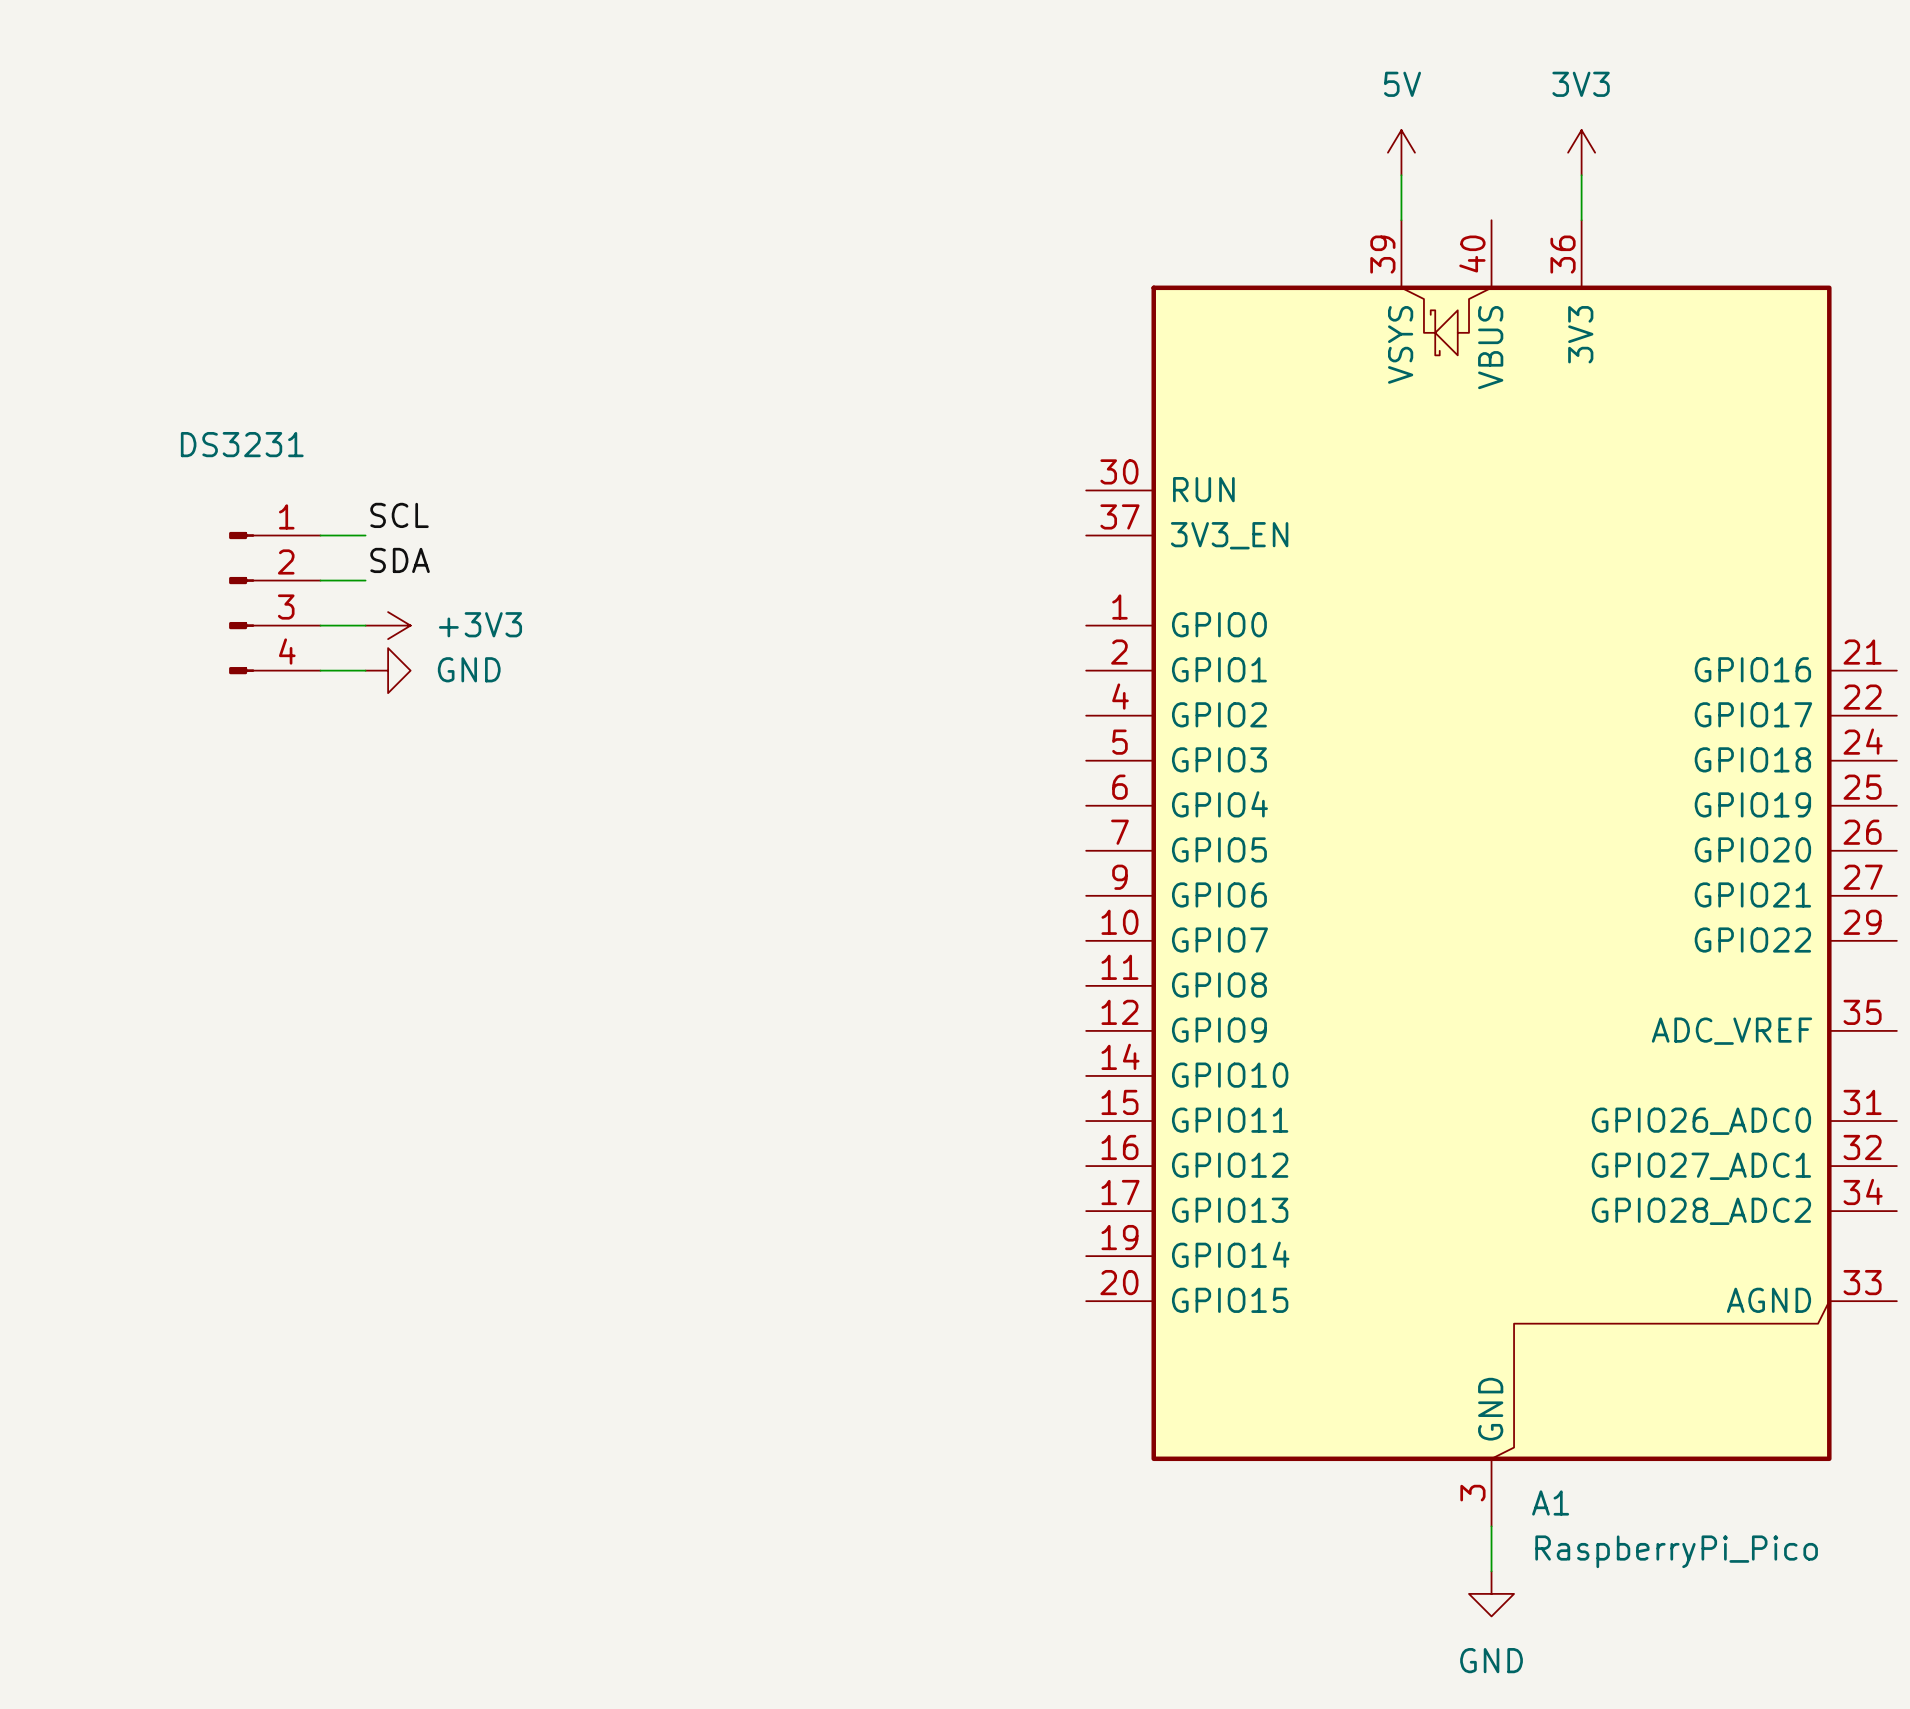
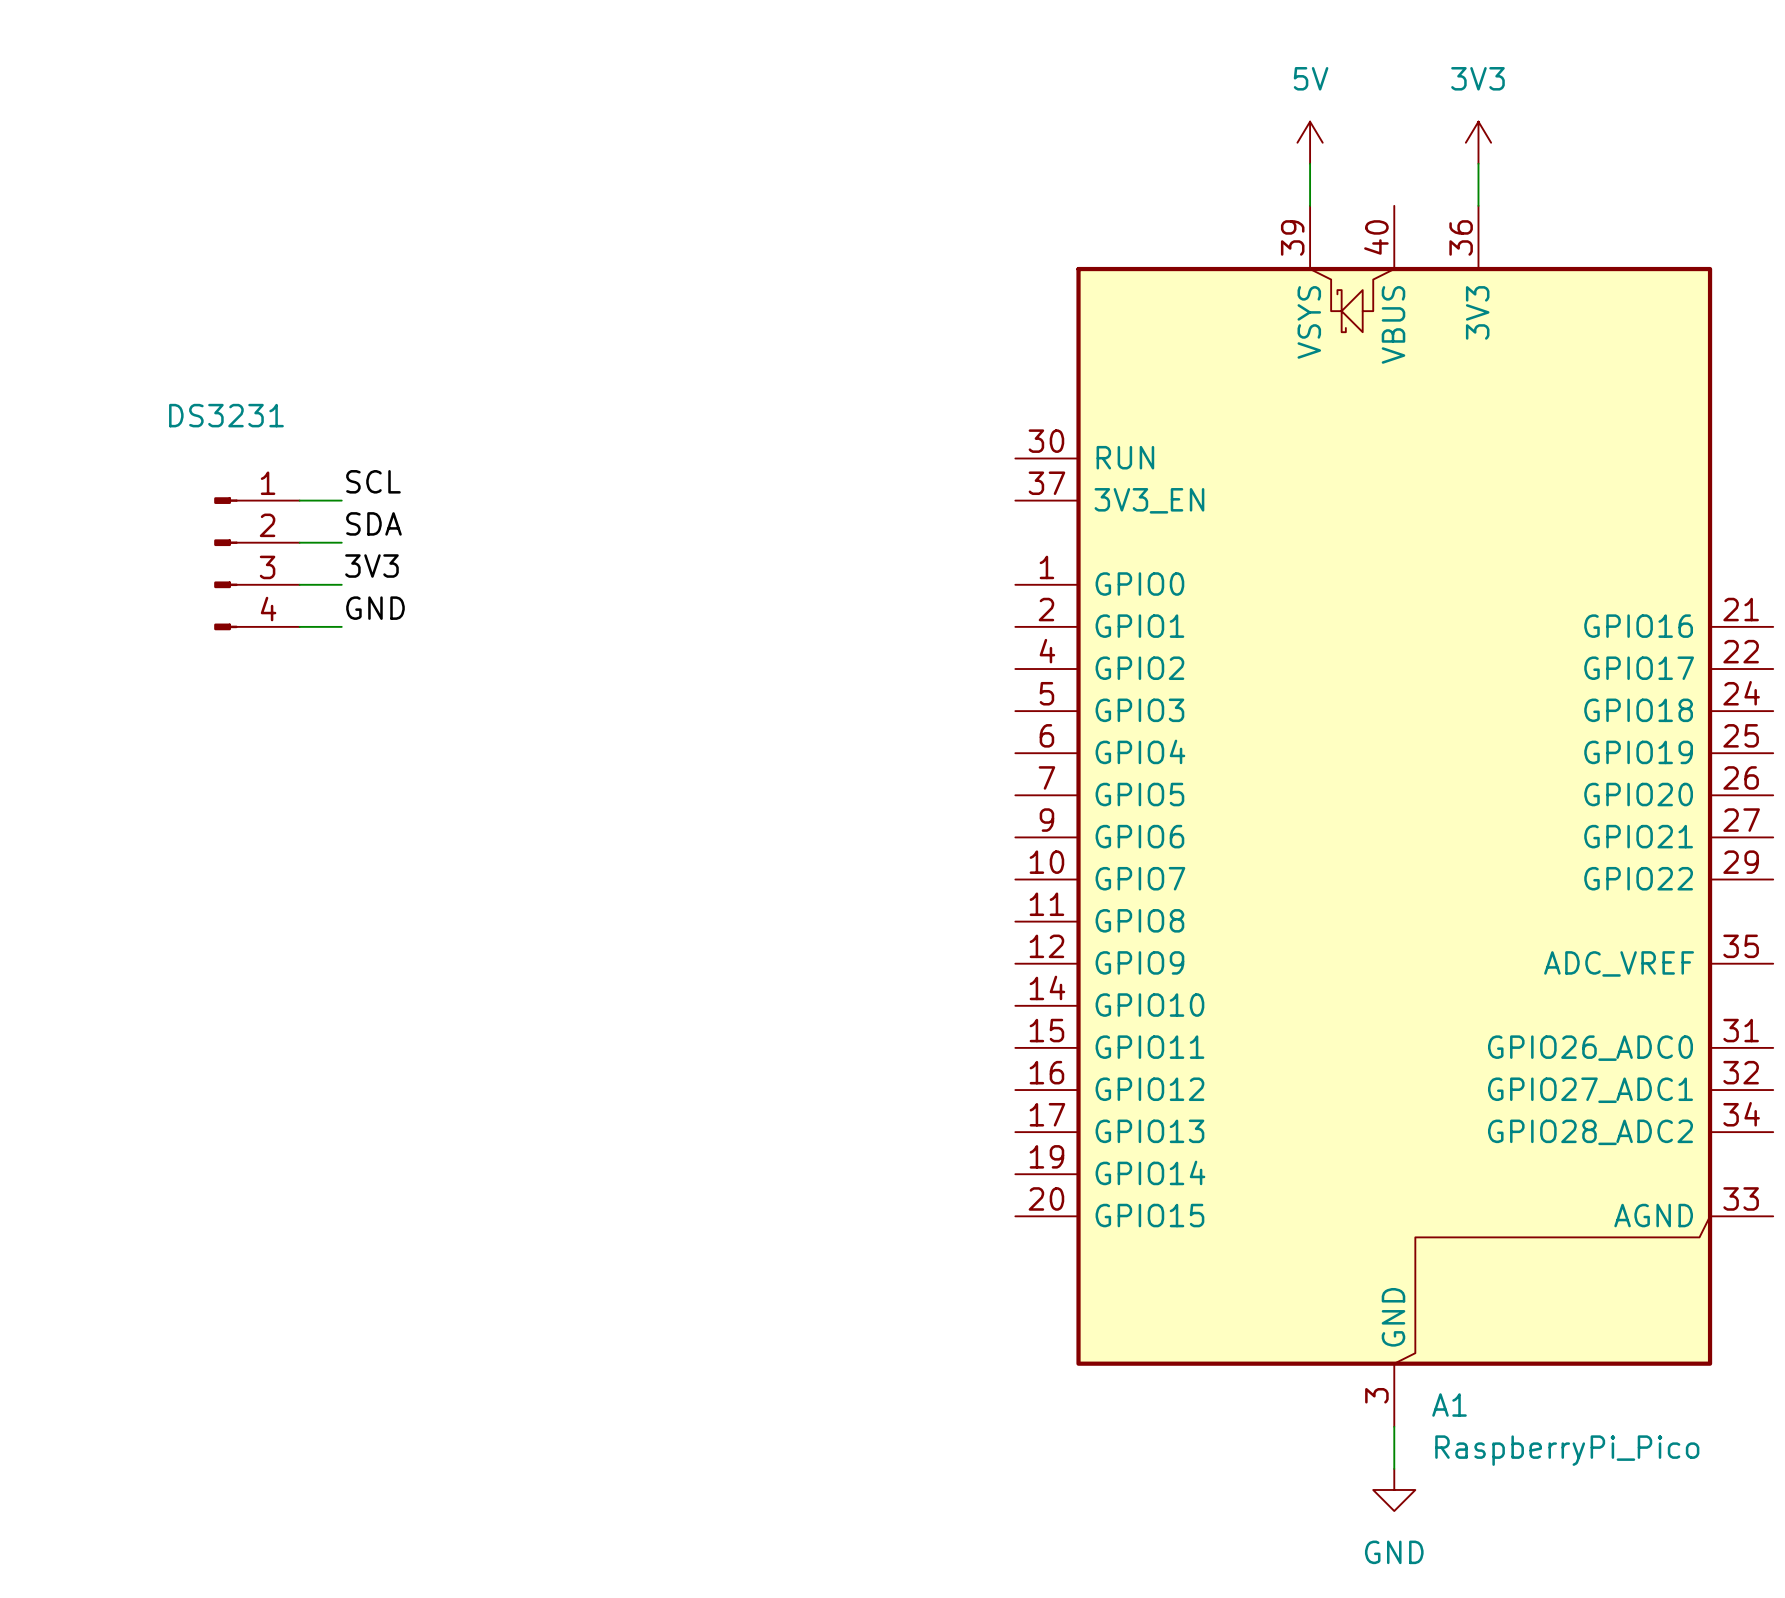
label: none -> 3V3 (371, 566)
power symbol: +3V3 (388, 625) -> none
label: none -> GND (375, 608)
power symbol: GND (388, 670) -> none

